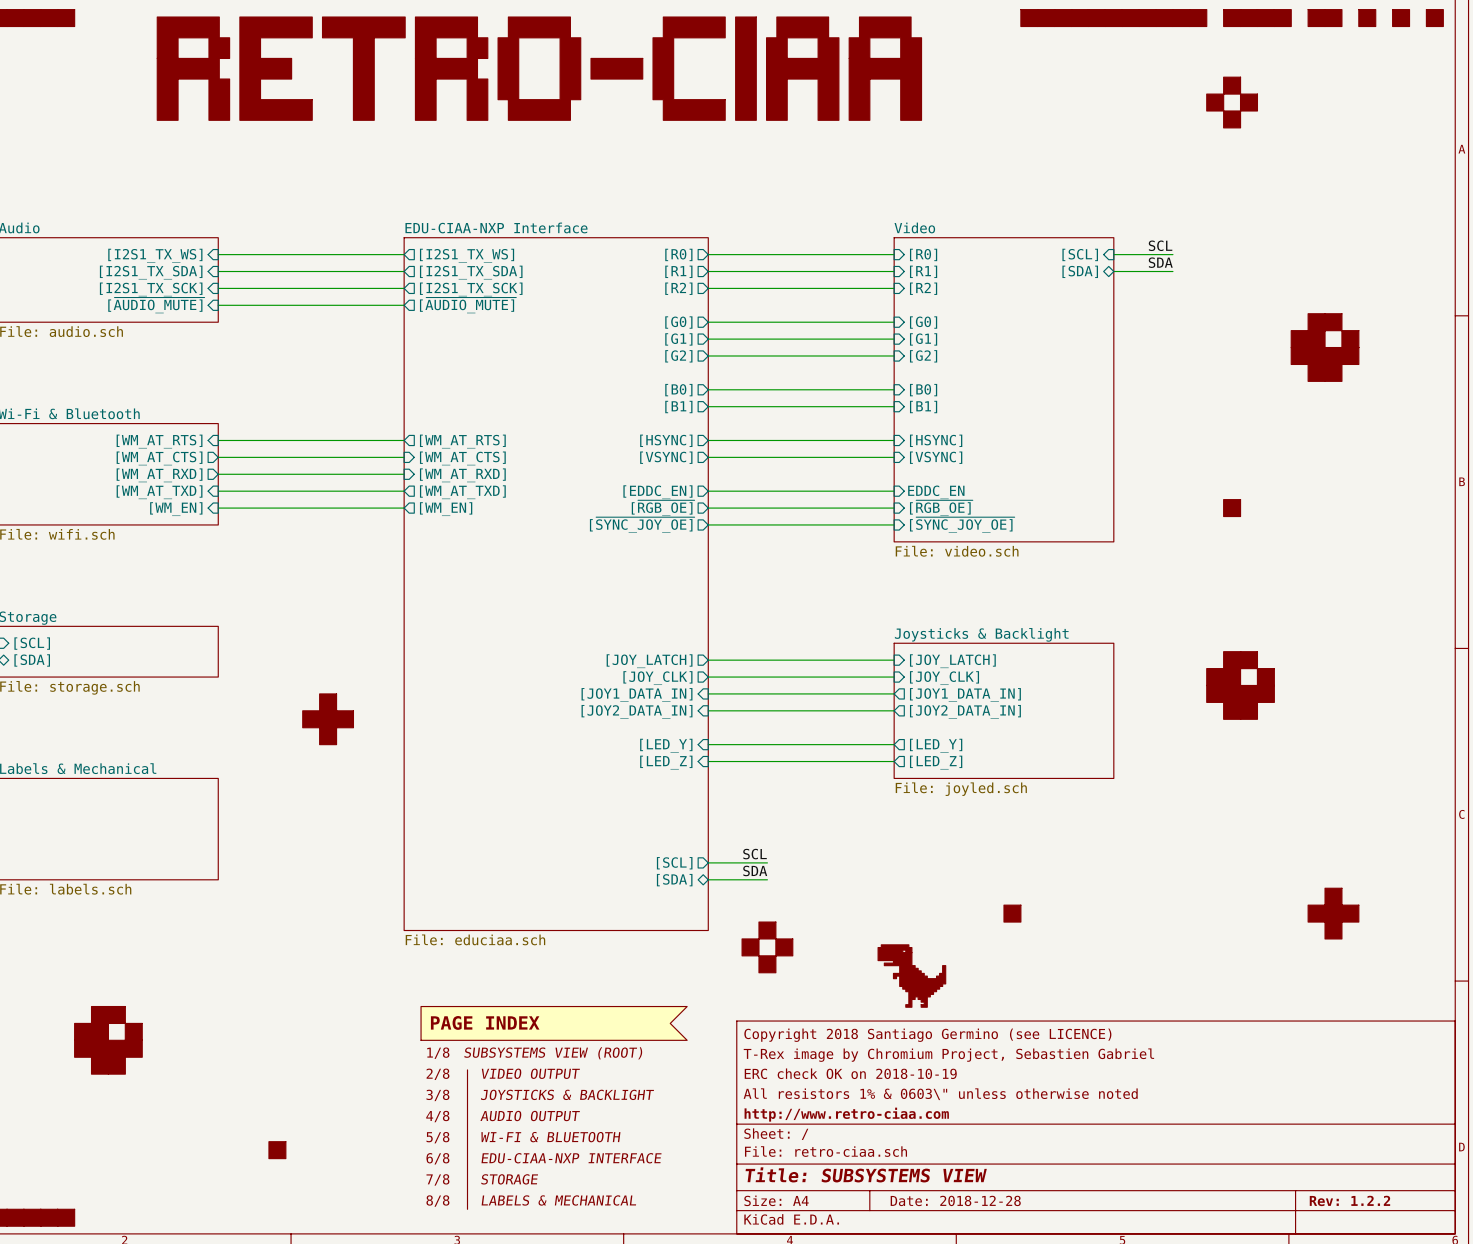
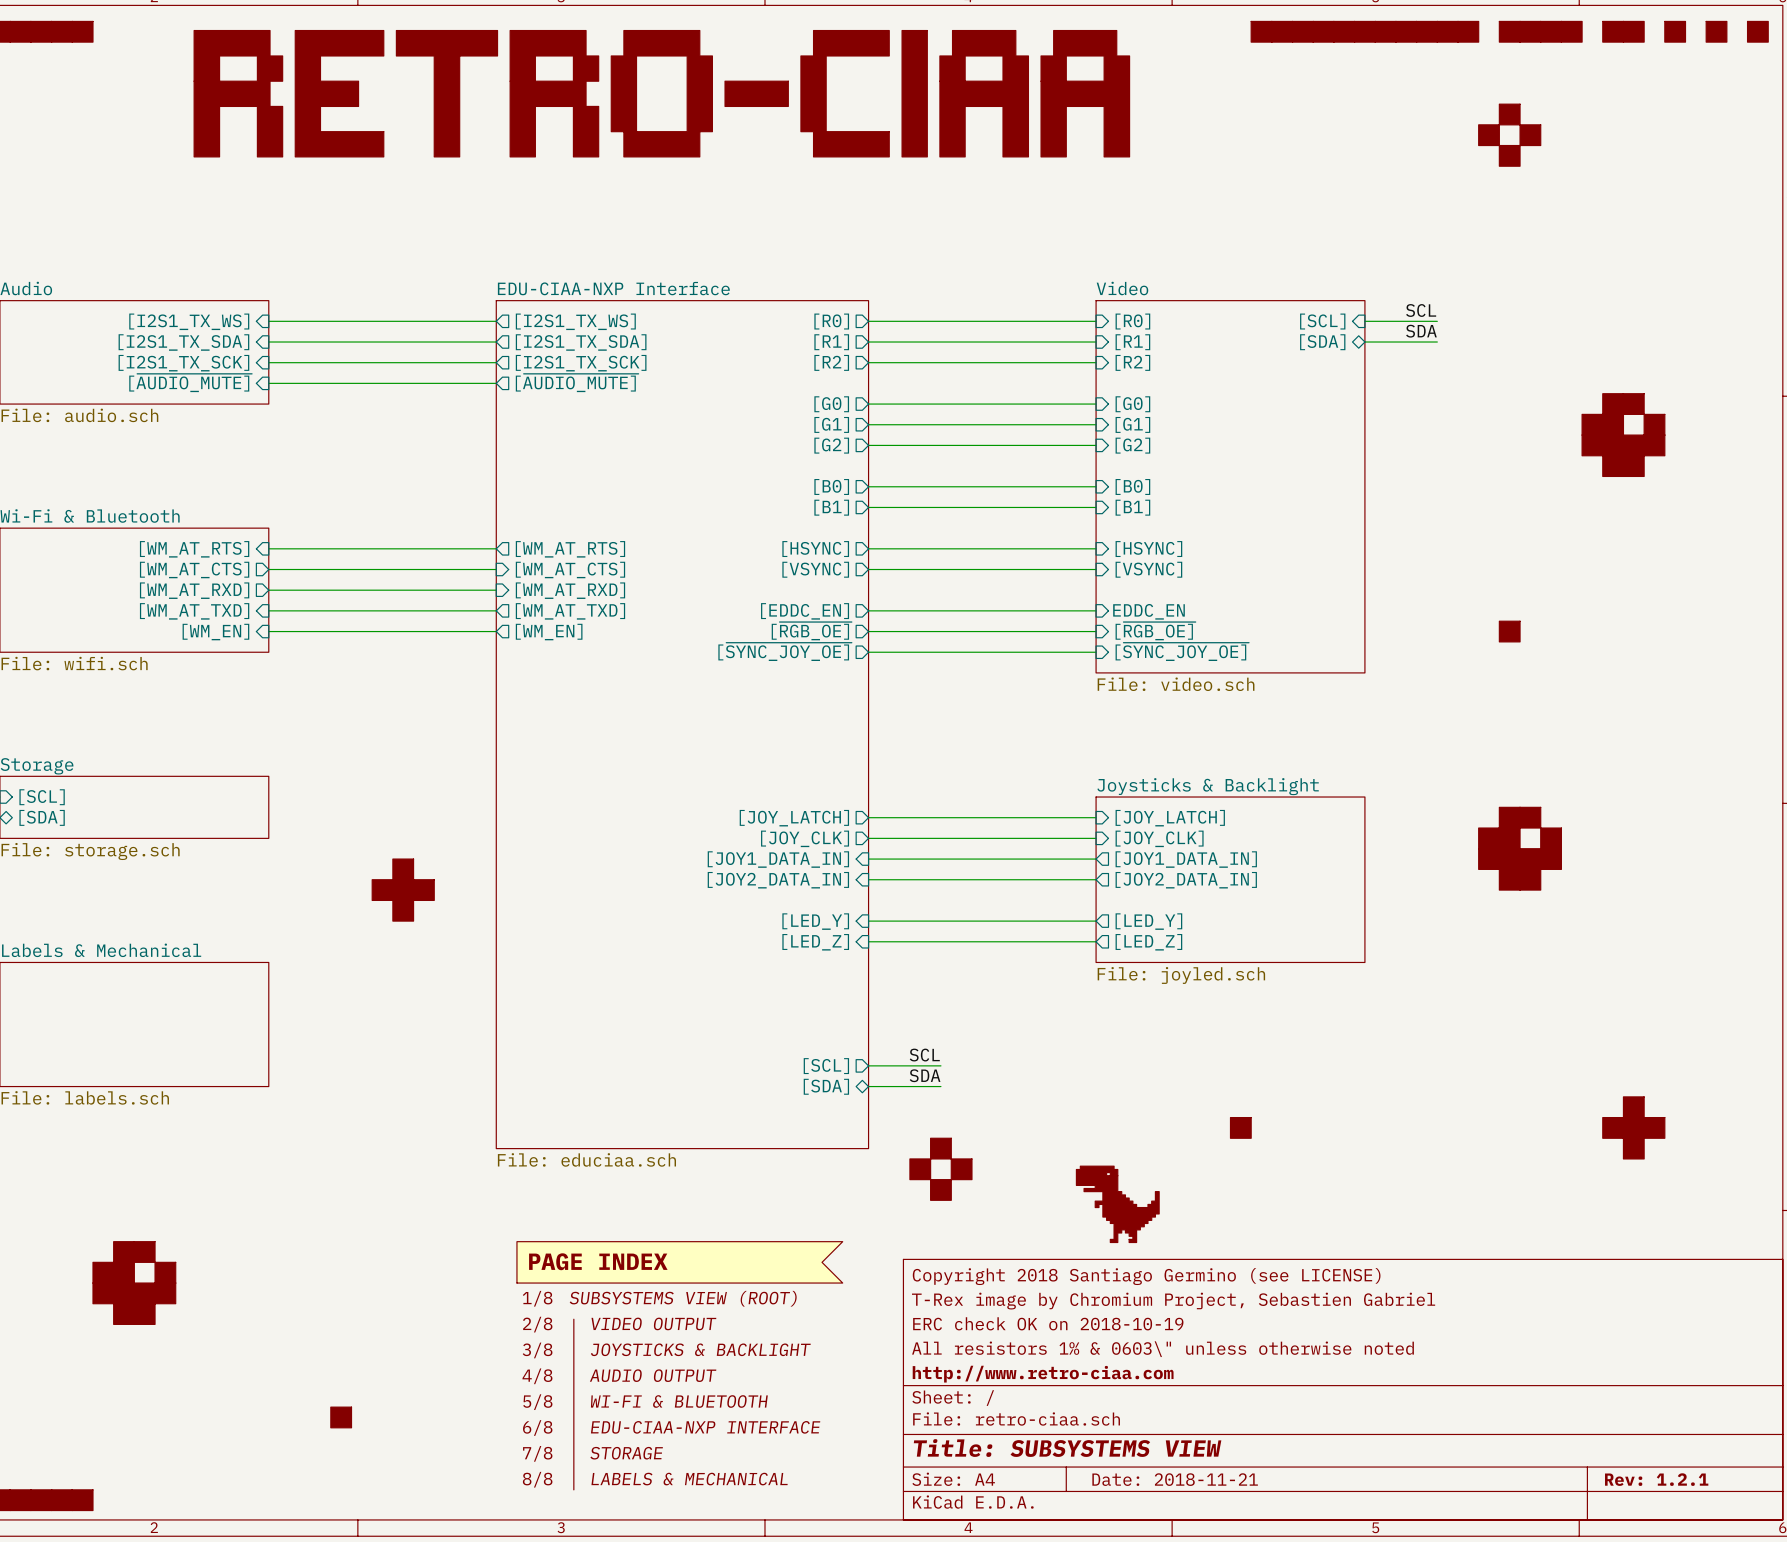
title block: Copyright 2018 Santiago Germino (see LICENCE) (927, 1035) -> Copyright 2018 Santiago Germino (see LICENSE) (1146, 1276)
title block: Date: 2018-12-28 (955, 1200) -> Date: 2018-11-21 (1175, 1479)
title block: Rev: 1.2.2 (1349, 1200) -> Rev: 1.2.1 (1656, 1479)

